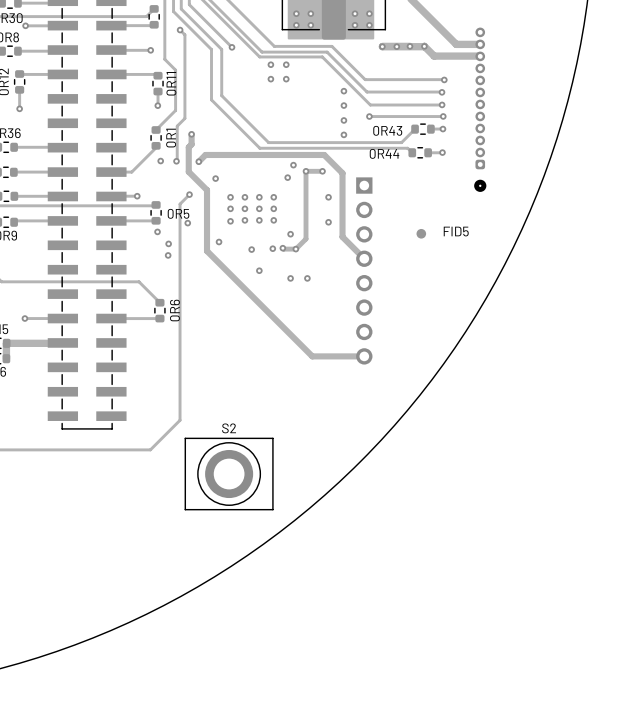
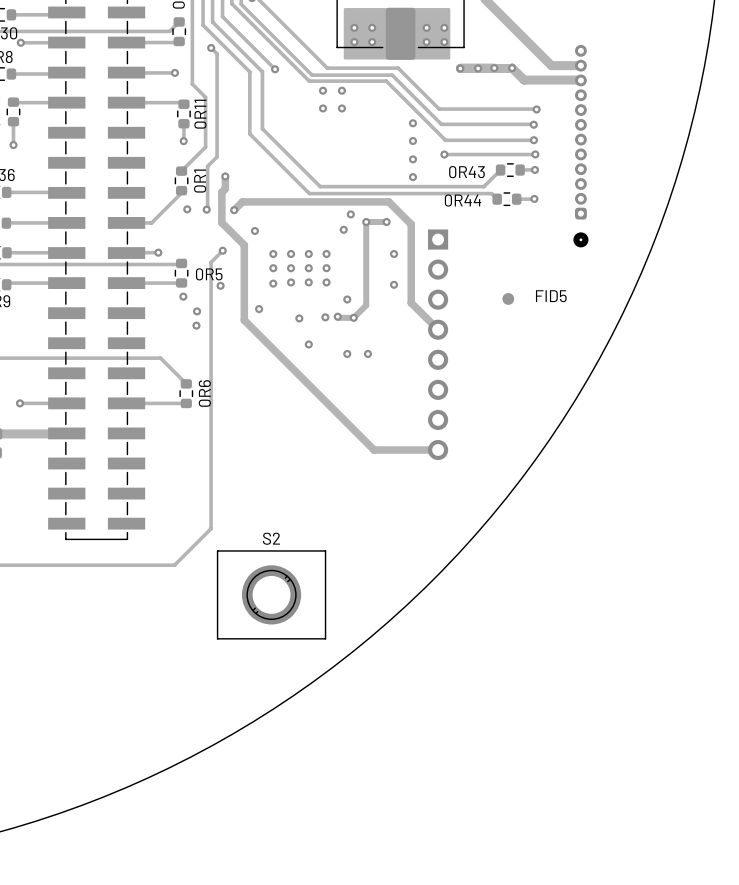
S2 footprint: [184, 437, 274, 511] -> [216, 550, 327, 640]

